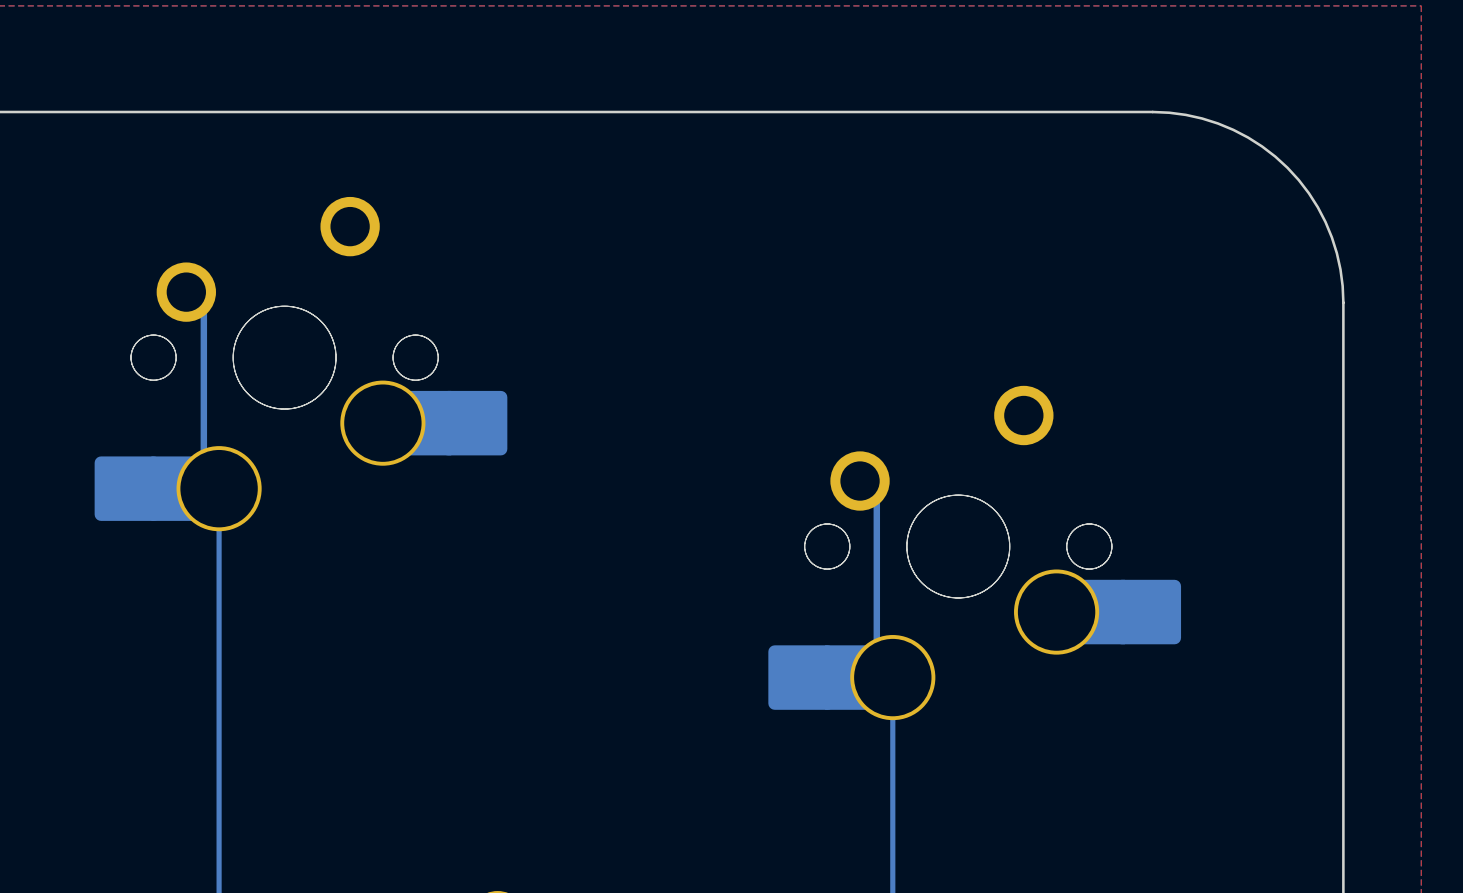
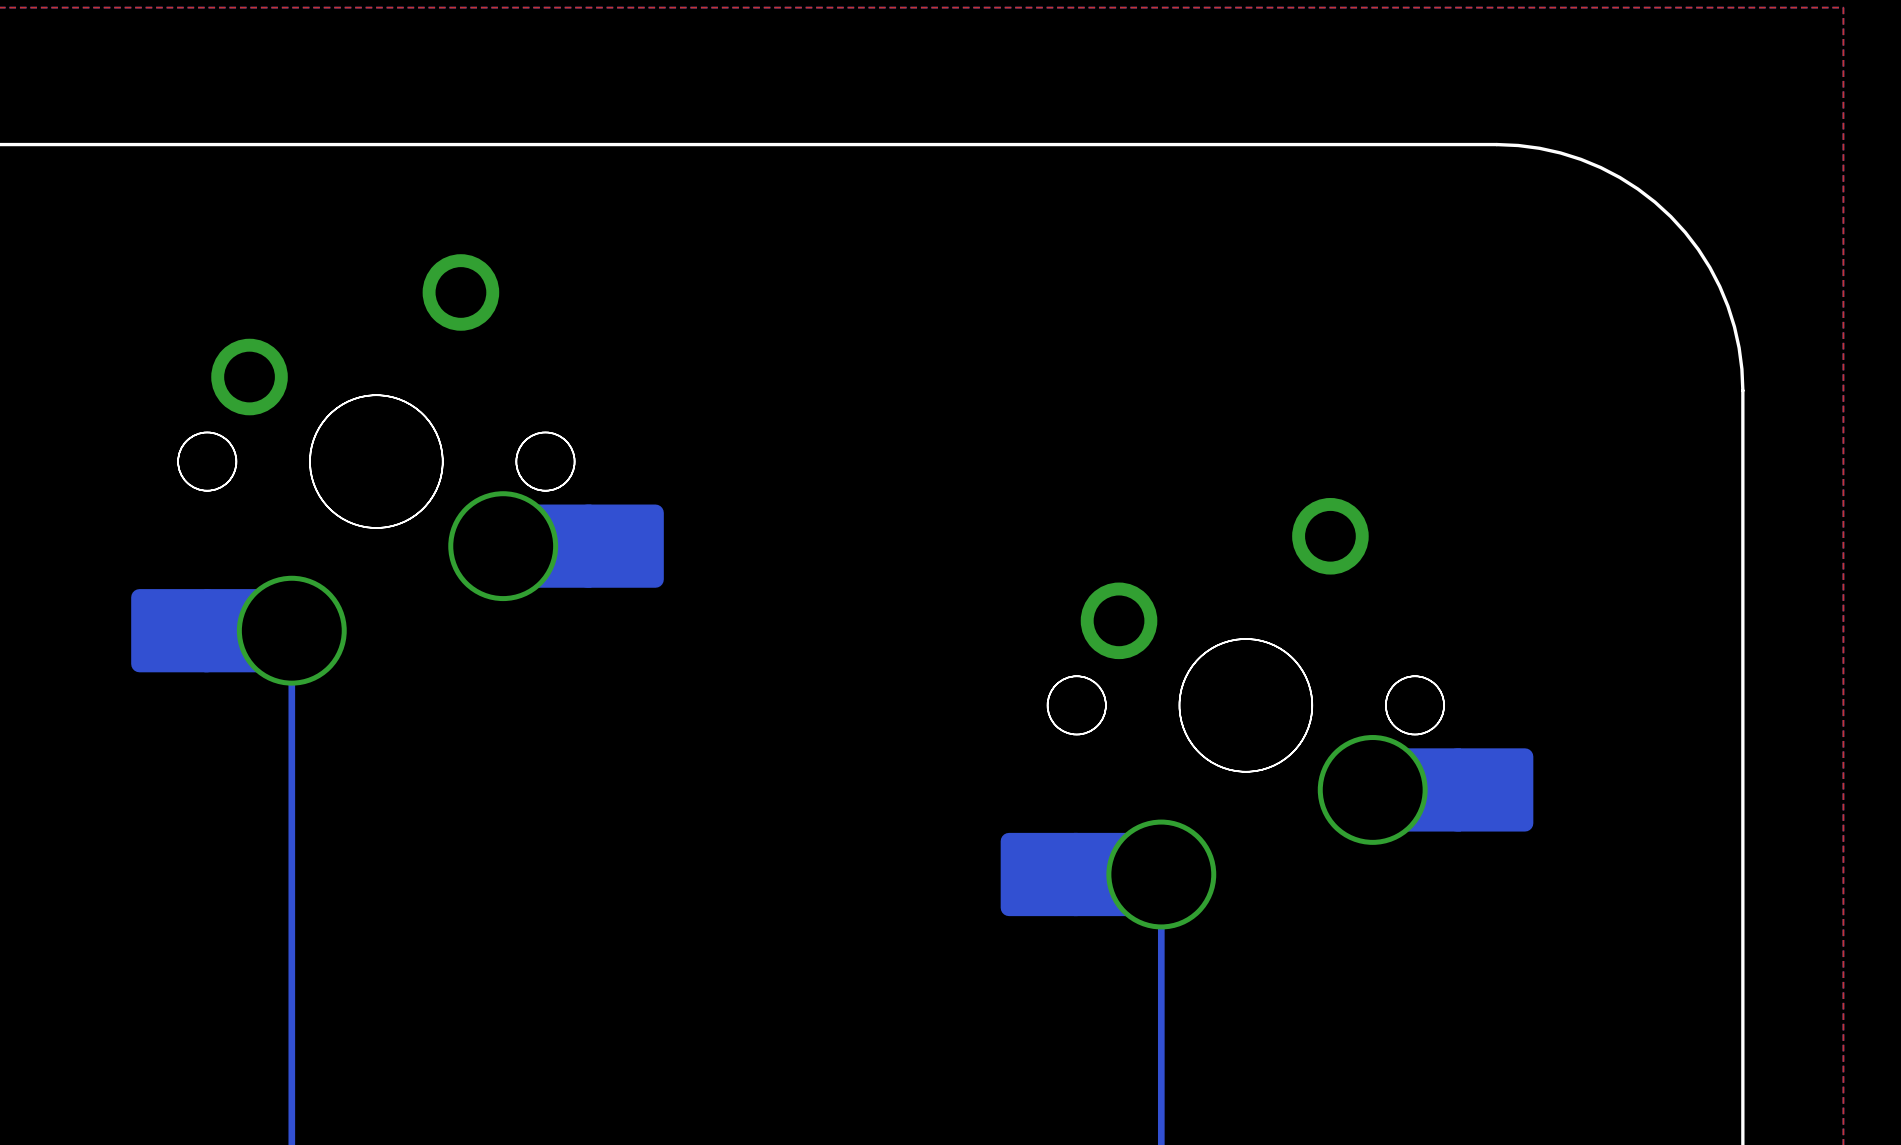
bottom track: (186, 292) (203, 309) (203, 473) (219, 488) -> none
bottom track: (860, 481) (876, 497) (876, 661) (892, 677) -> none

